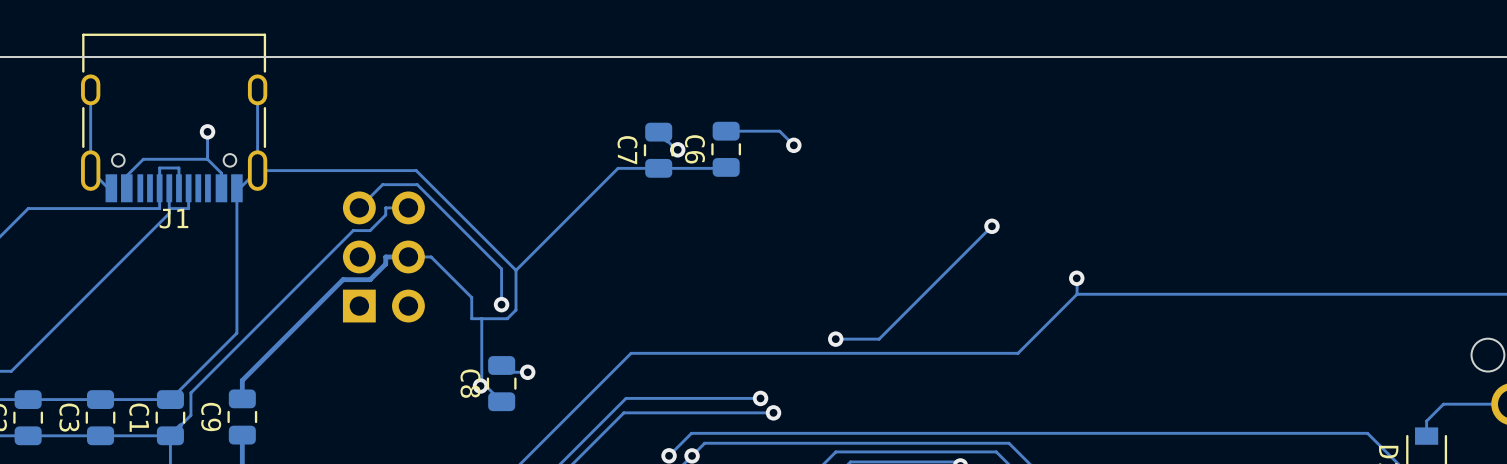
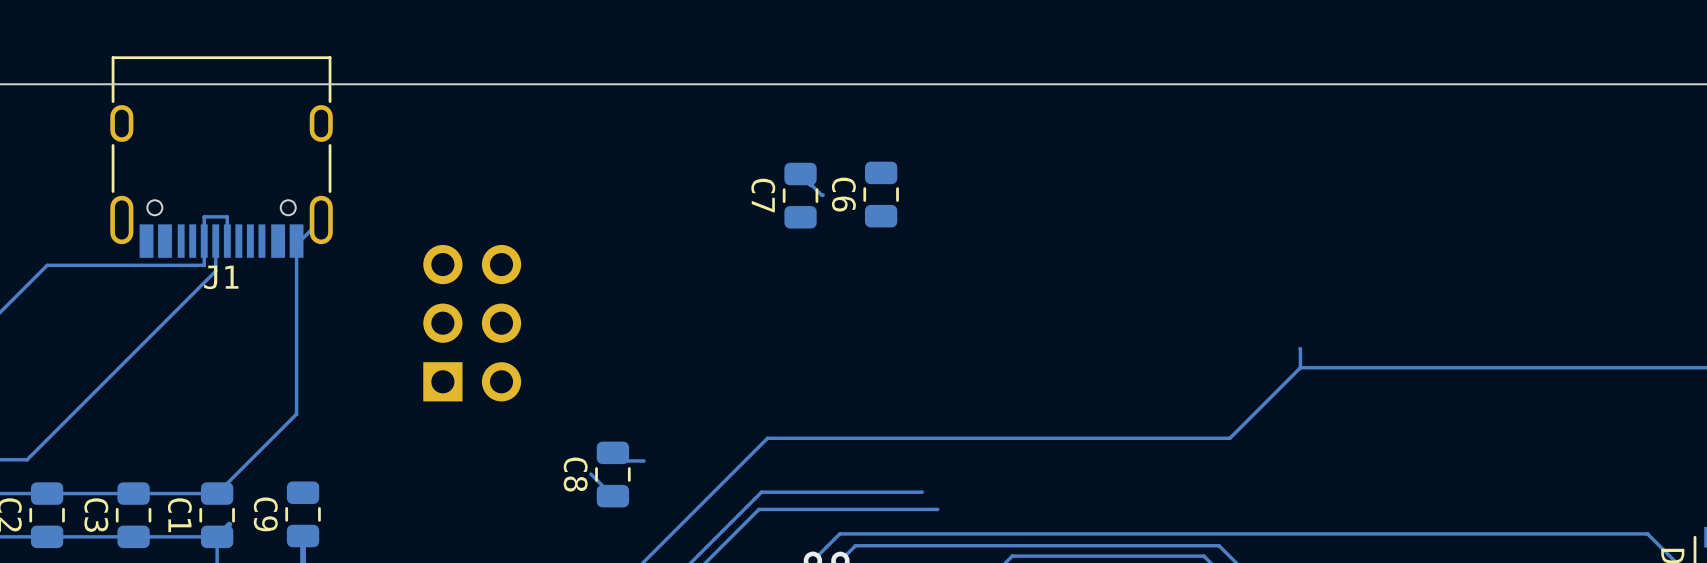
track: (90, 89) (90, 170) (108, 188) (111, 188) -> none
track: (257, 89) (257, 170) (416, 170) (516, 270) -> none
track: (207, 131) (207, 159) -> none
via: (207, 131) -> none
track: (726, 131) (779, 131) (793, 145) -> none
via: (793, 145) -> none
via: (677, 149) -> none
track: (207, 159) (143, 159) (126, 175) (126, 188) -> none
track: (207, 159) (221, 173) (221, 188) -> none
track: (726, 167) (618, 168) (516, 270) -> none
track: (188, 188) (188, 208) (169, 208) -> none
track: (359, 207) (382, 184) (417, 184) (501, 268) (501, 304) -> none
track: (408, 207) (385, 207) (385, 214) (370, 230) (353, 230) (190, 392) (190, 415) (175, 430) -> none
track: (991, 226) (879, 339) (835, 339) -> none
via: (991, 226) -> none
track: (516, 270) (516, 310) (507, 318) (471, 318) (471, 297) (431, 256) (385, 256) (385, 264) (370, 279) (343, 279) (242, 380) (242, 398) -> none
via: (1076, 278) -> none
via: (501, 304) -> none
track: (481, 318) (483, 383) (480, 386) -> none
via: (835, 339) -> none
via: (527, 372) -> none
via: (480, 386) -> none
via: (760, 398) -> none
via: (773, 412) -> none

